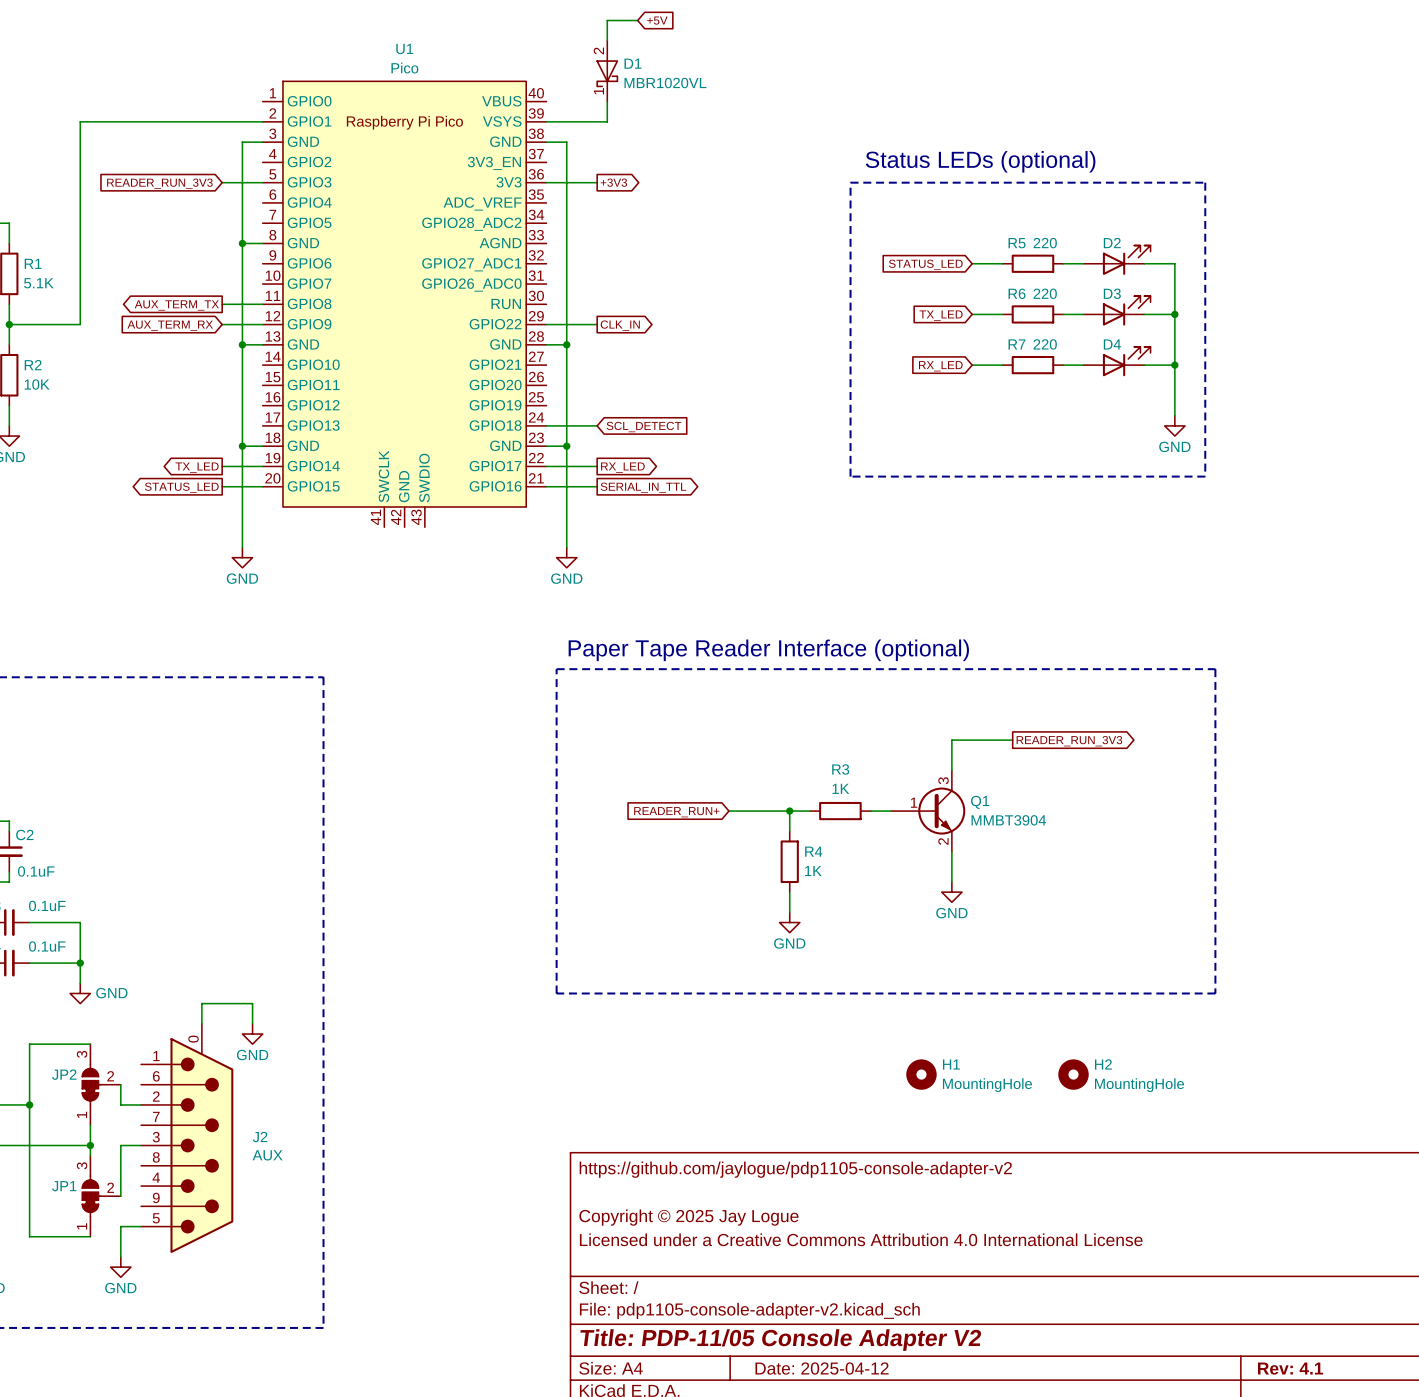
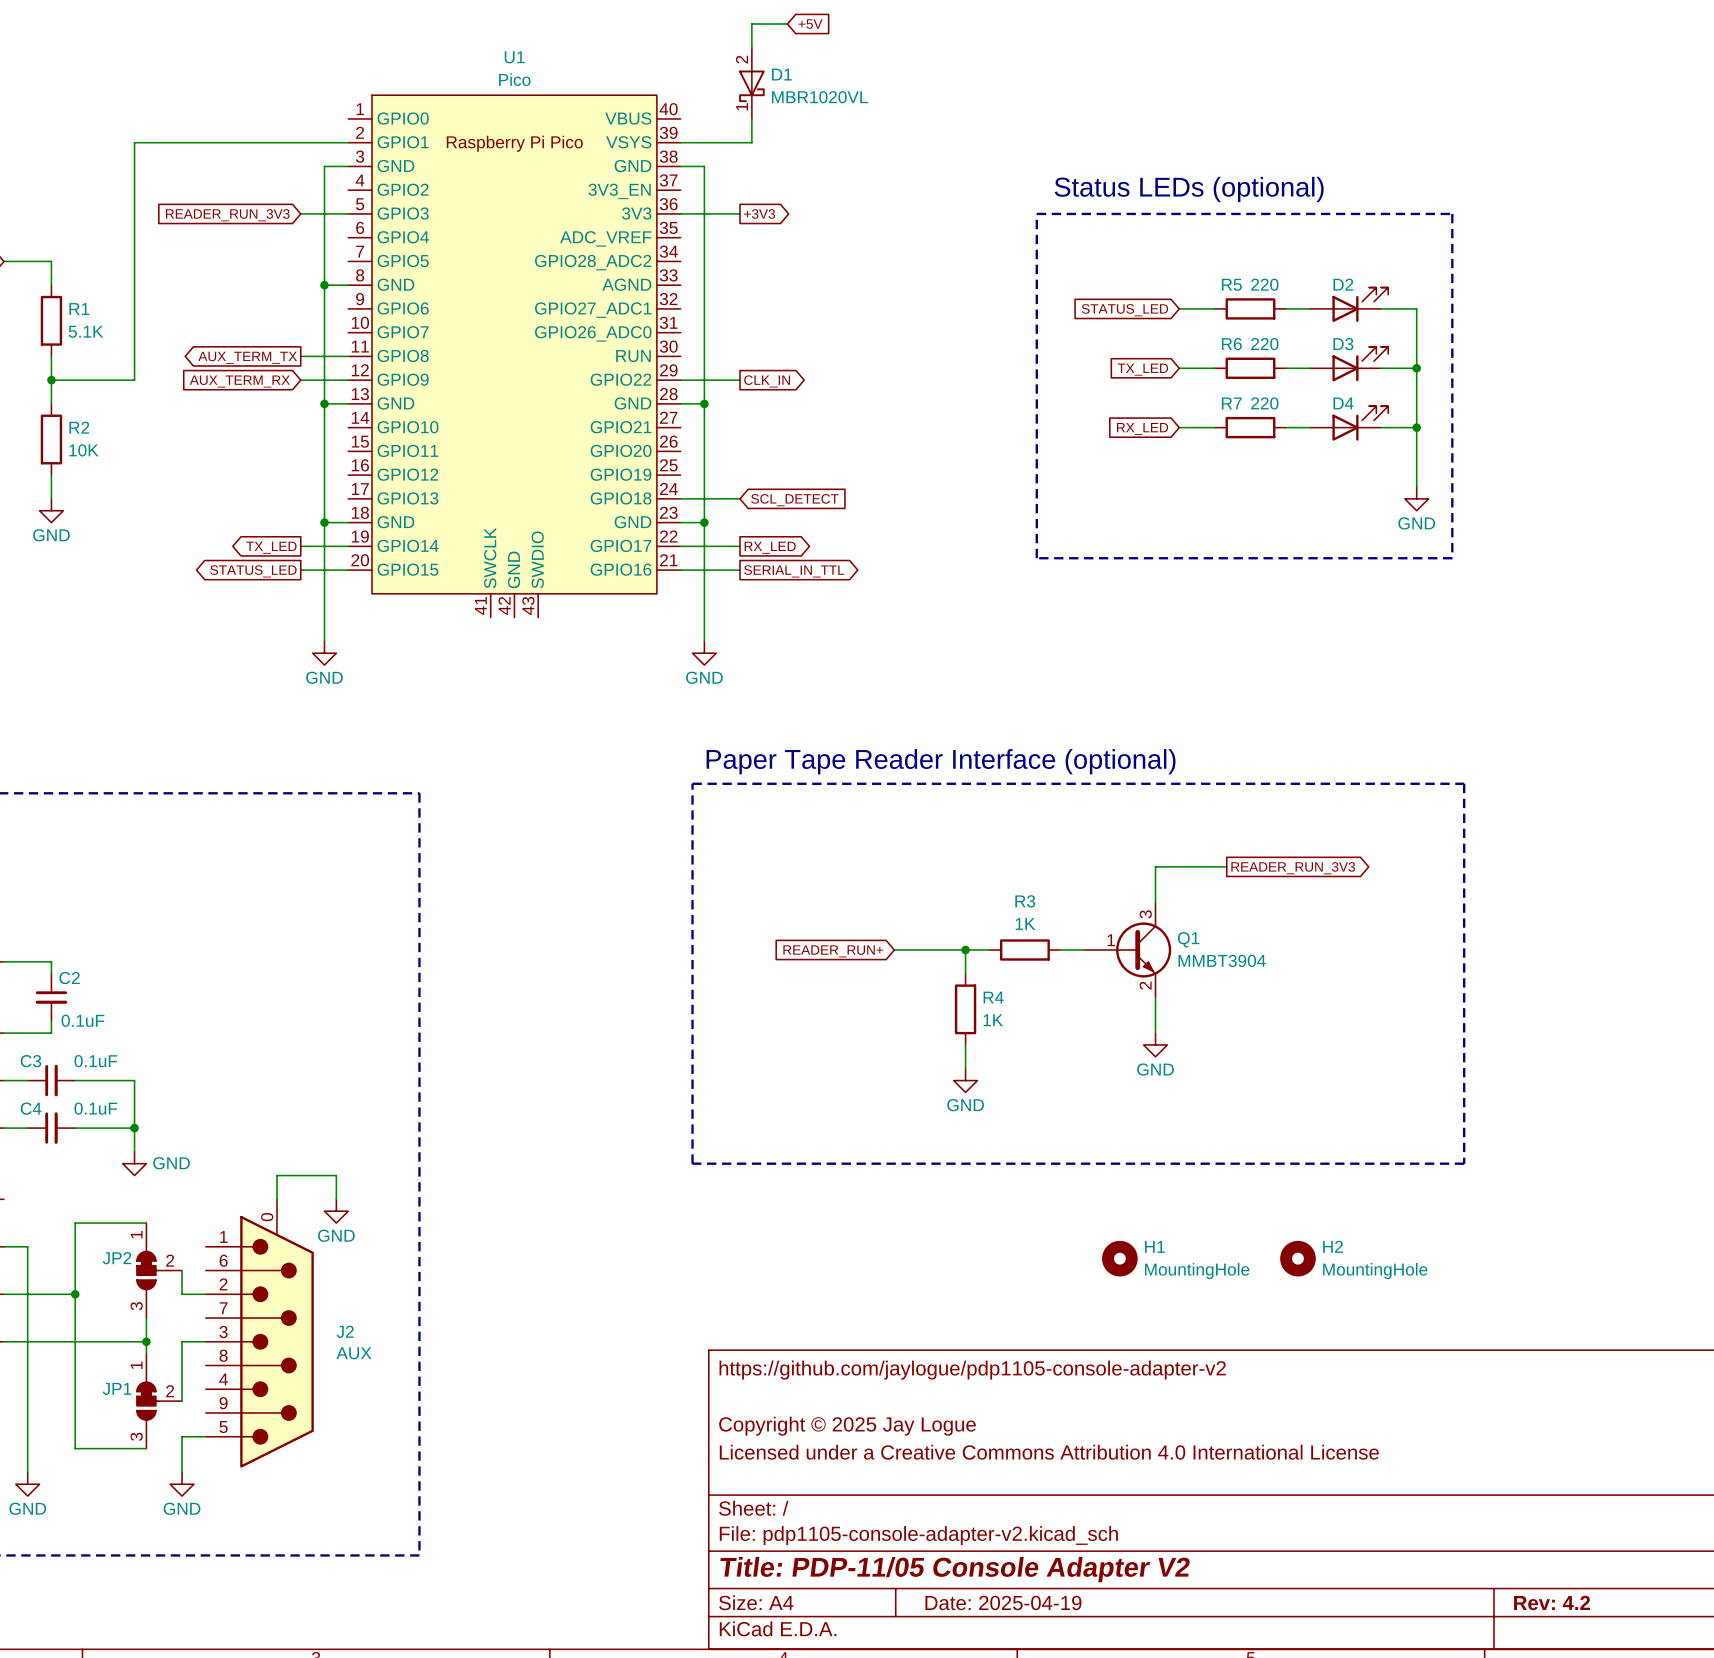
JP2 flip: as is (91, 1084) -> up-down (147, 1270)
JP1 flip: as is (91, 1196) -> up-down (147, 1401)
title block: Date: 2025-04-12 (822, 1368) -> Date: 2025-04-19 (1003, 1602)
title block: Rev: 4.1 (1290, 1368) -> Rev: 4.2 (1552, 1602)

